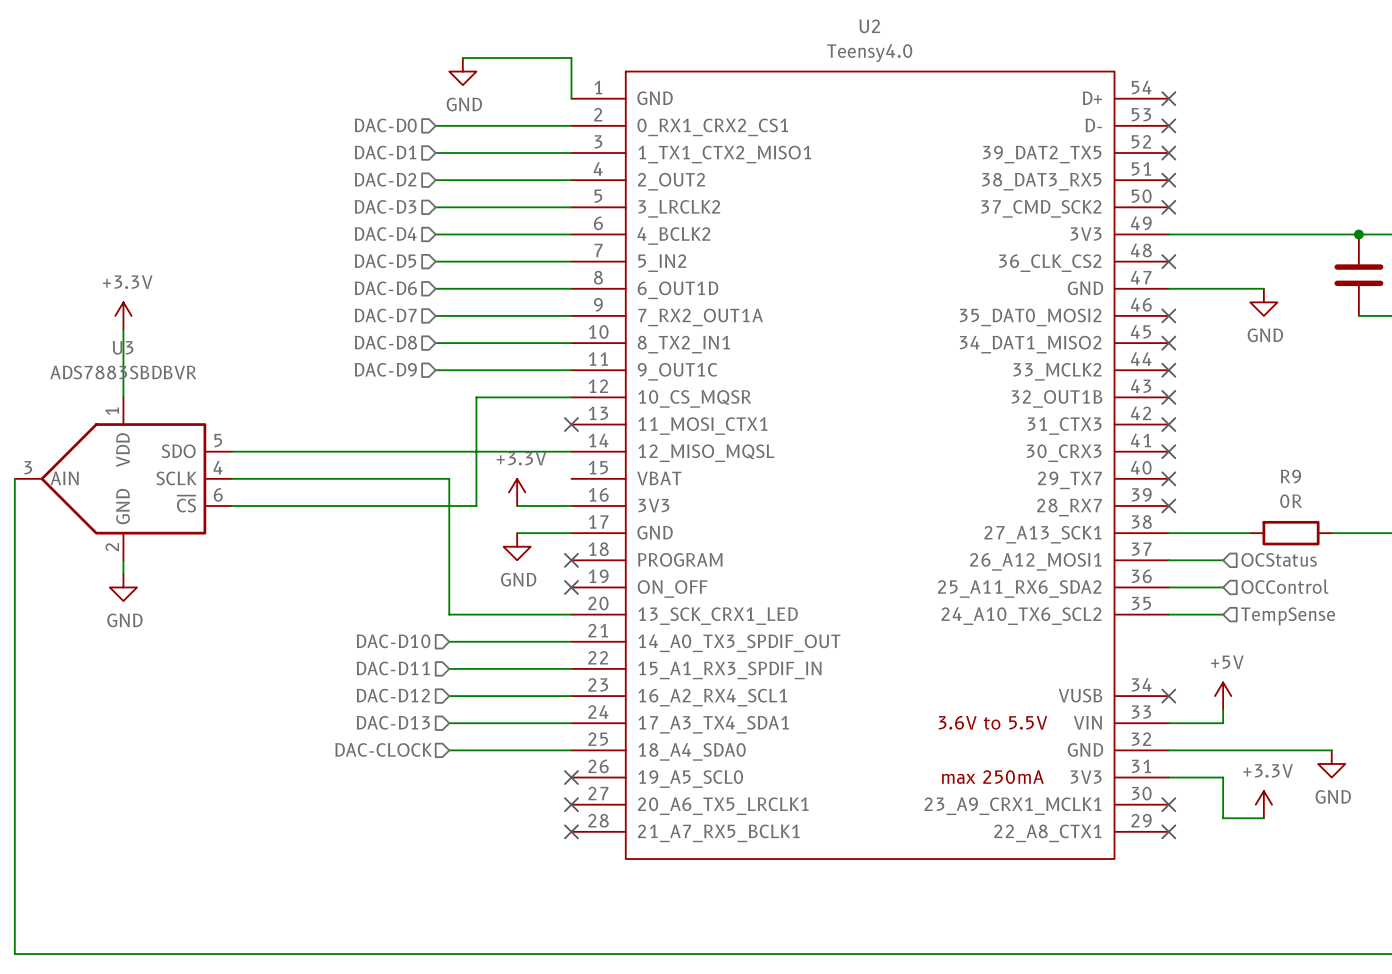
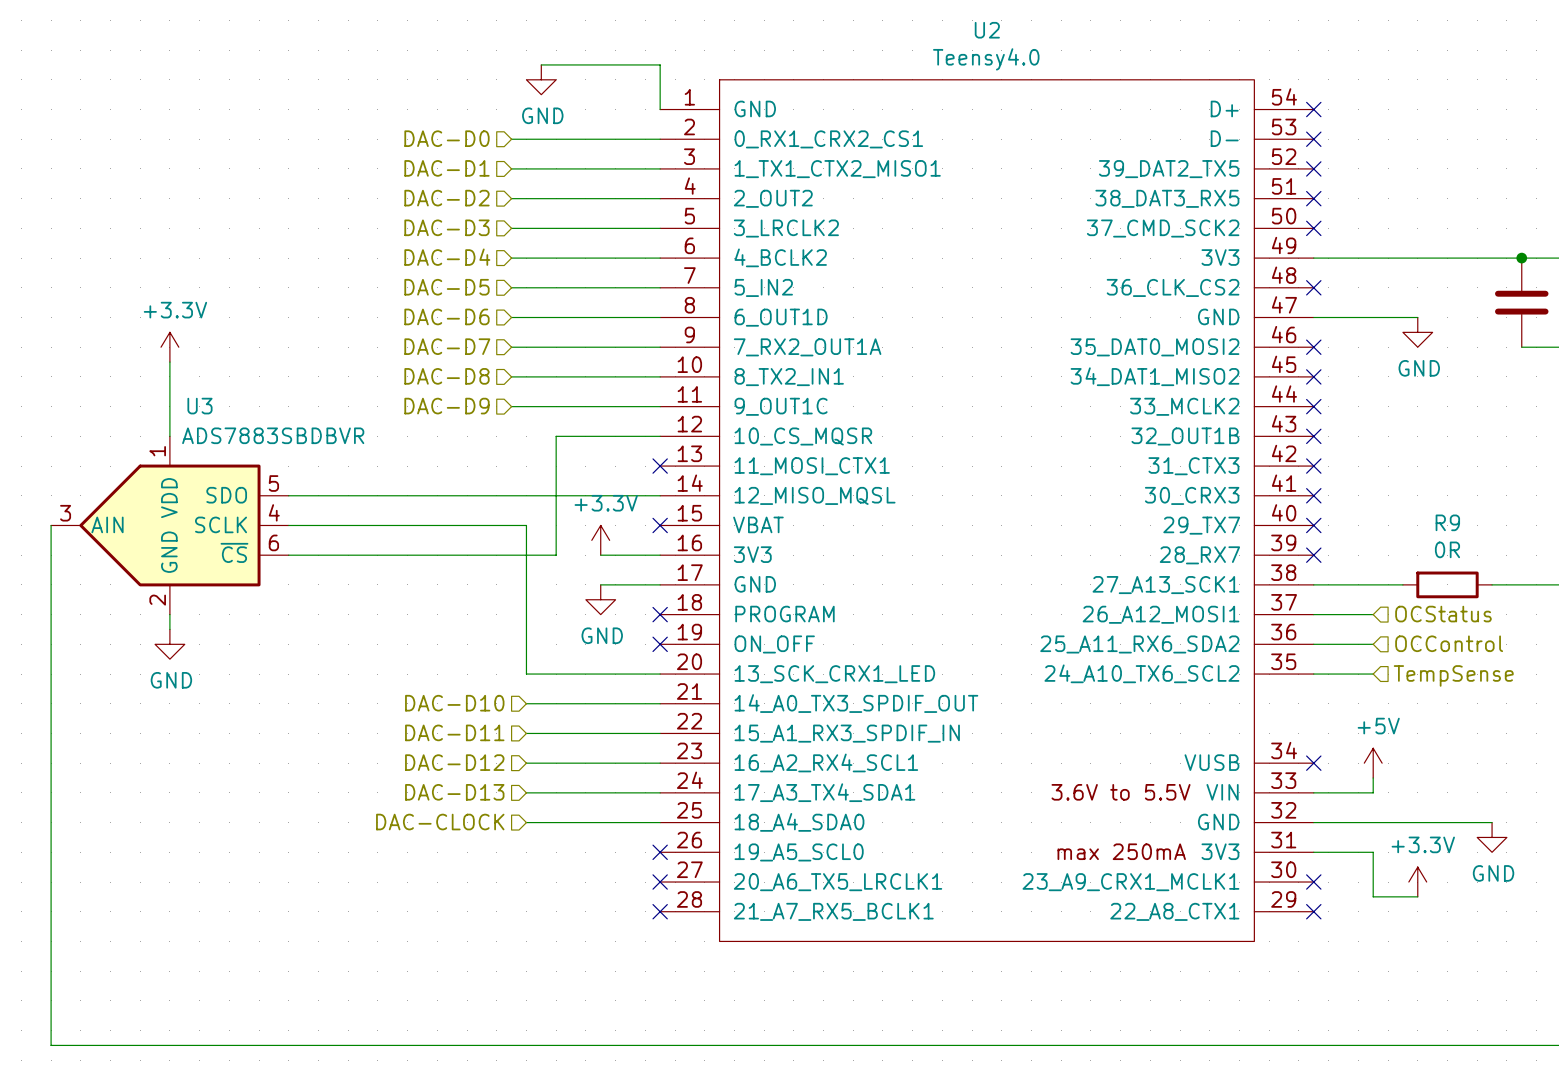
U3 name position: U3 (123, 347) -> U3 (199, 406)
U3 value position: ADS7883SBDBVR (123, 372) -> ADS7883SBDBVR (273, 435)
no-connect mark: none -> (660, 525)

